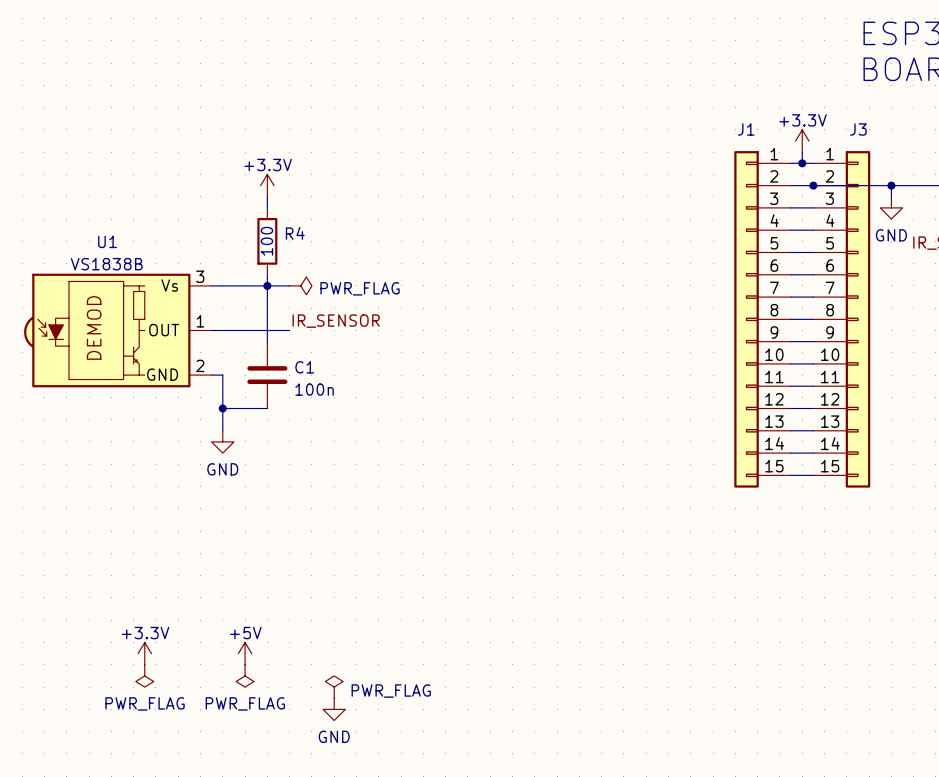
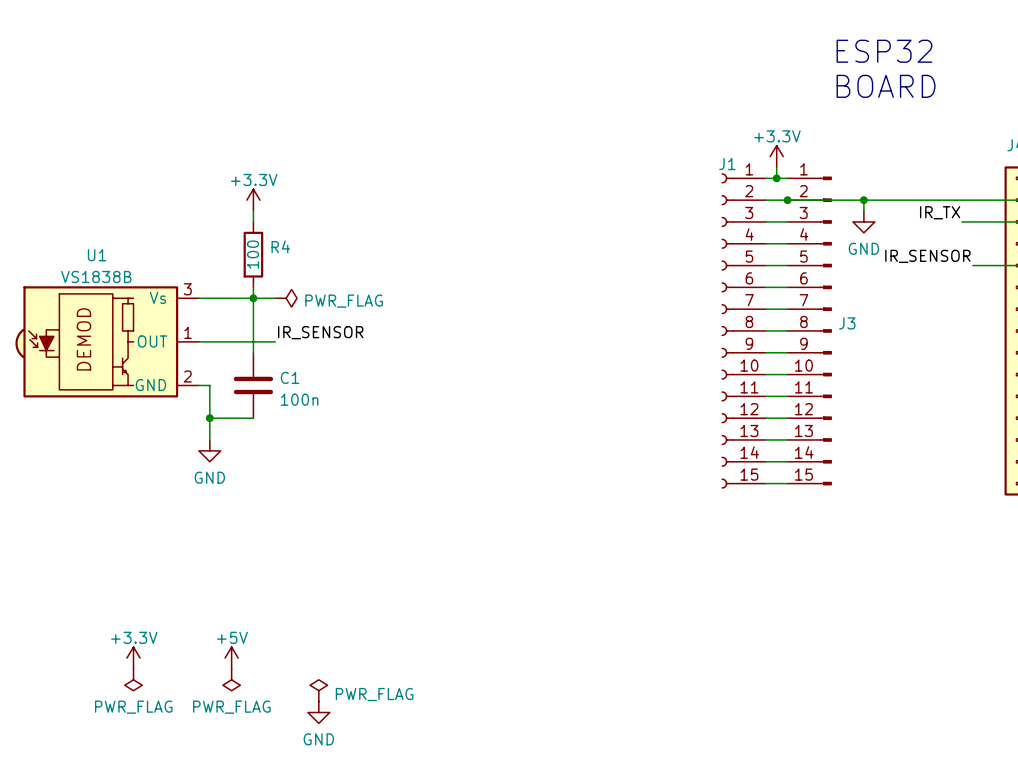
J1 name position: J1 (746, 129) -> J1 (727, 164)
J3 name position: J3 (858, 129) -> J3 (847, 323)
J1 symbol: [734, 151, 792, 488] -> [721, 173, 766, 489]
J3 symbol: [813, 151, 871, 488] -> [787, 176, 832, 486]

